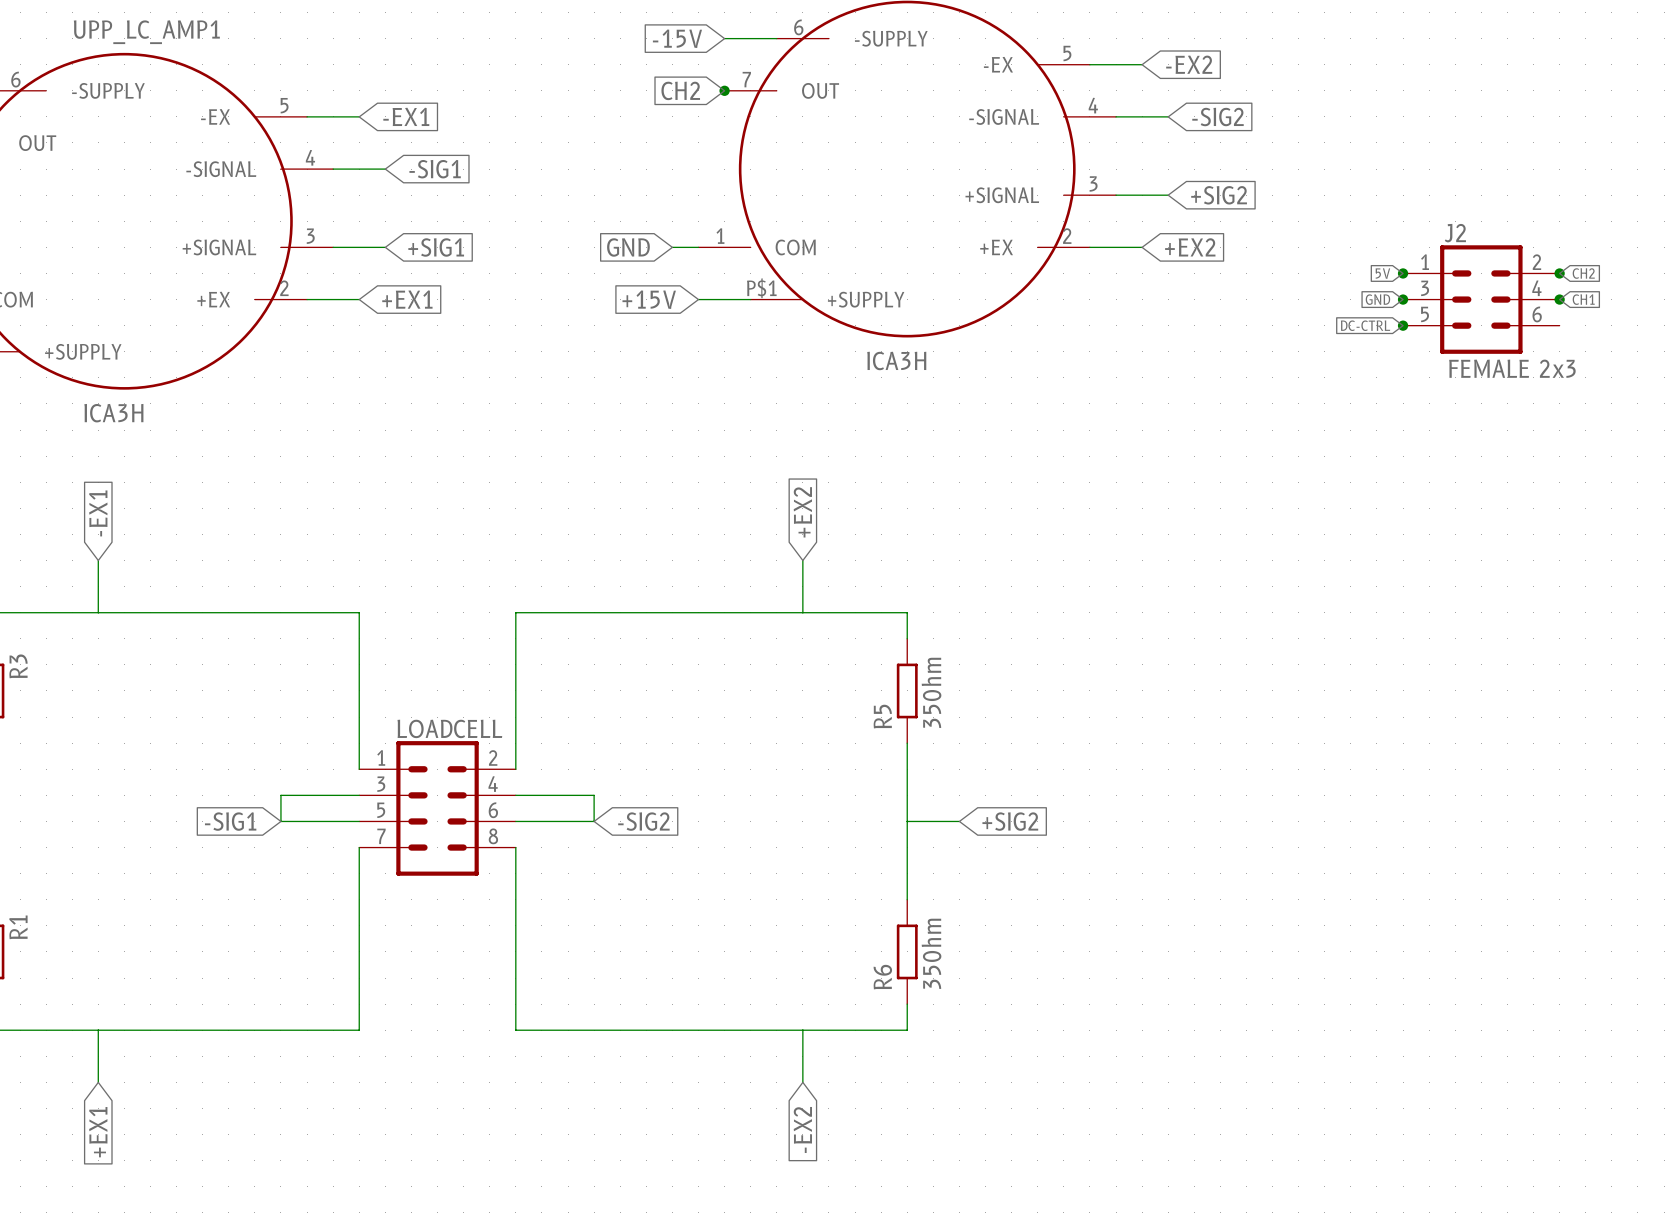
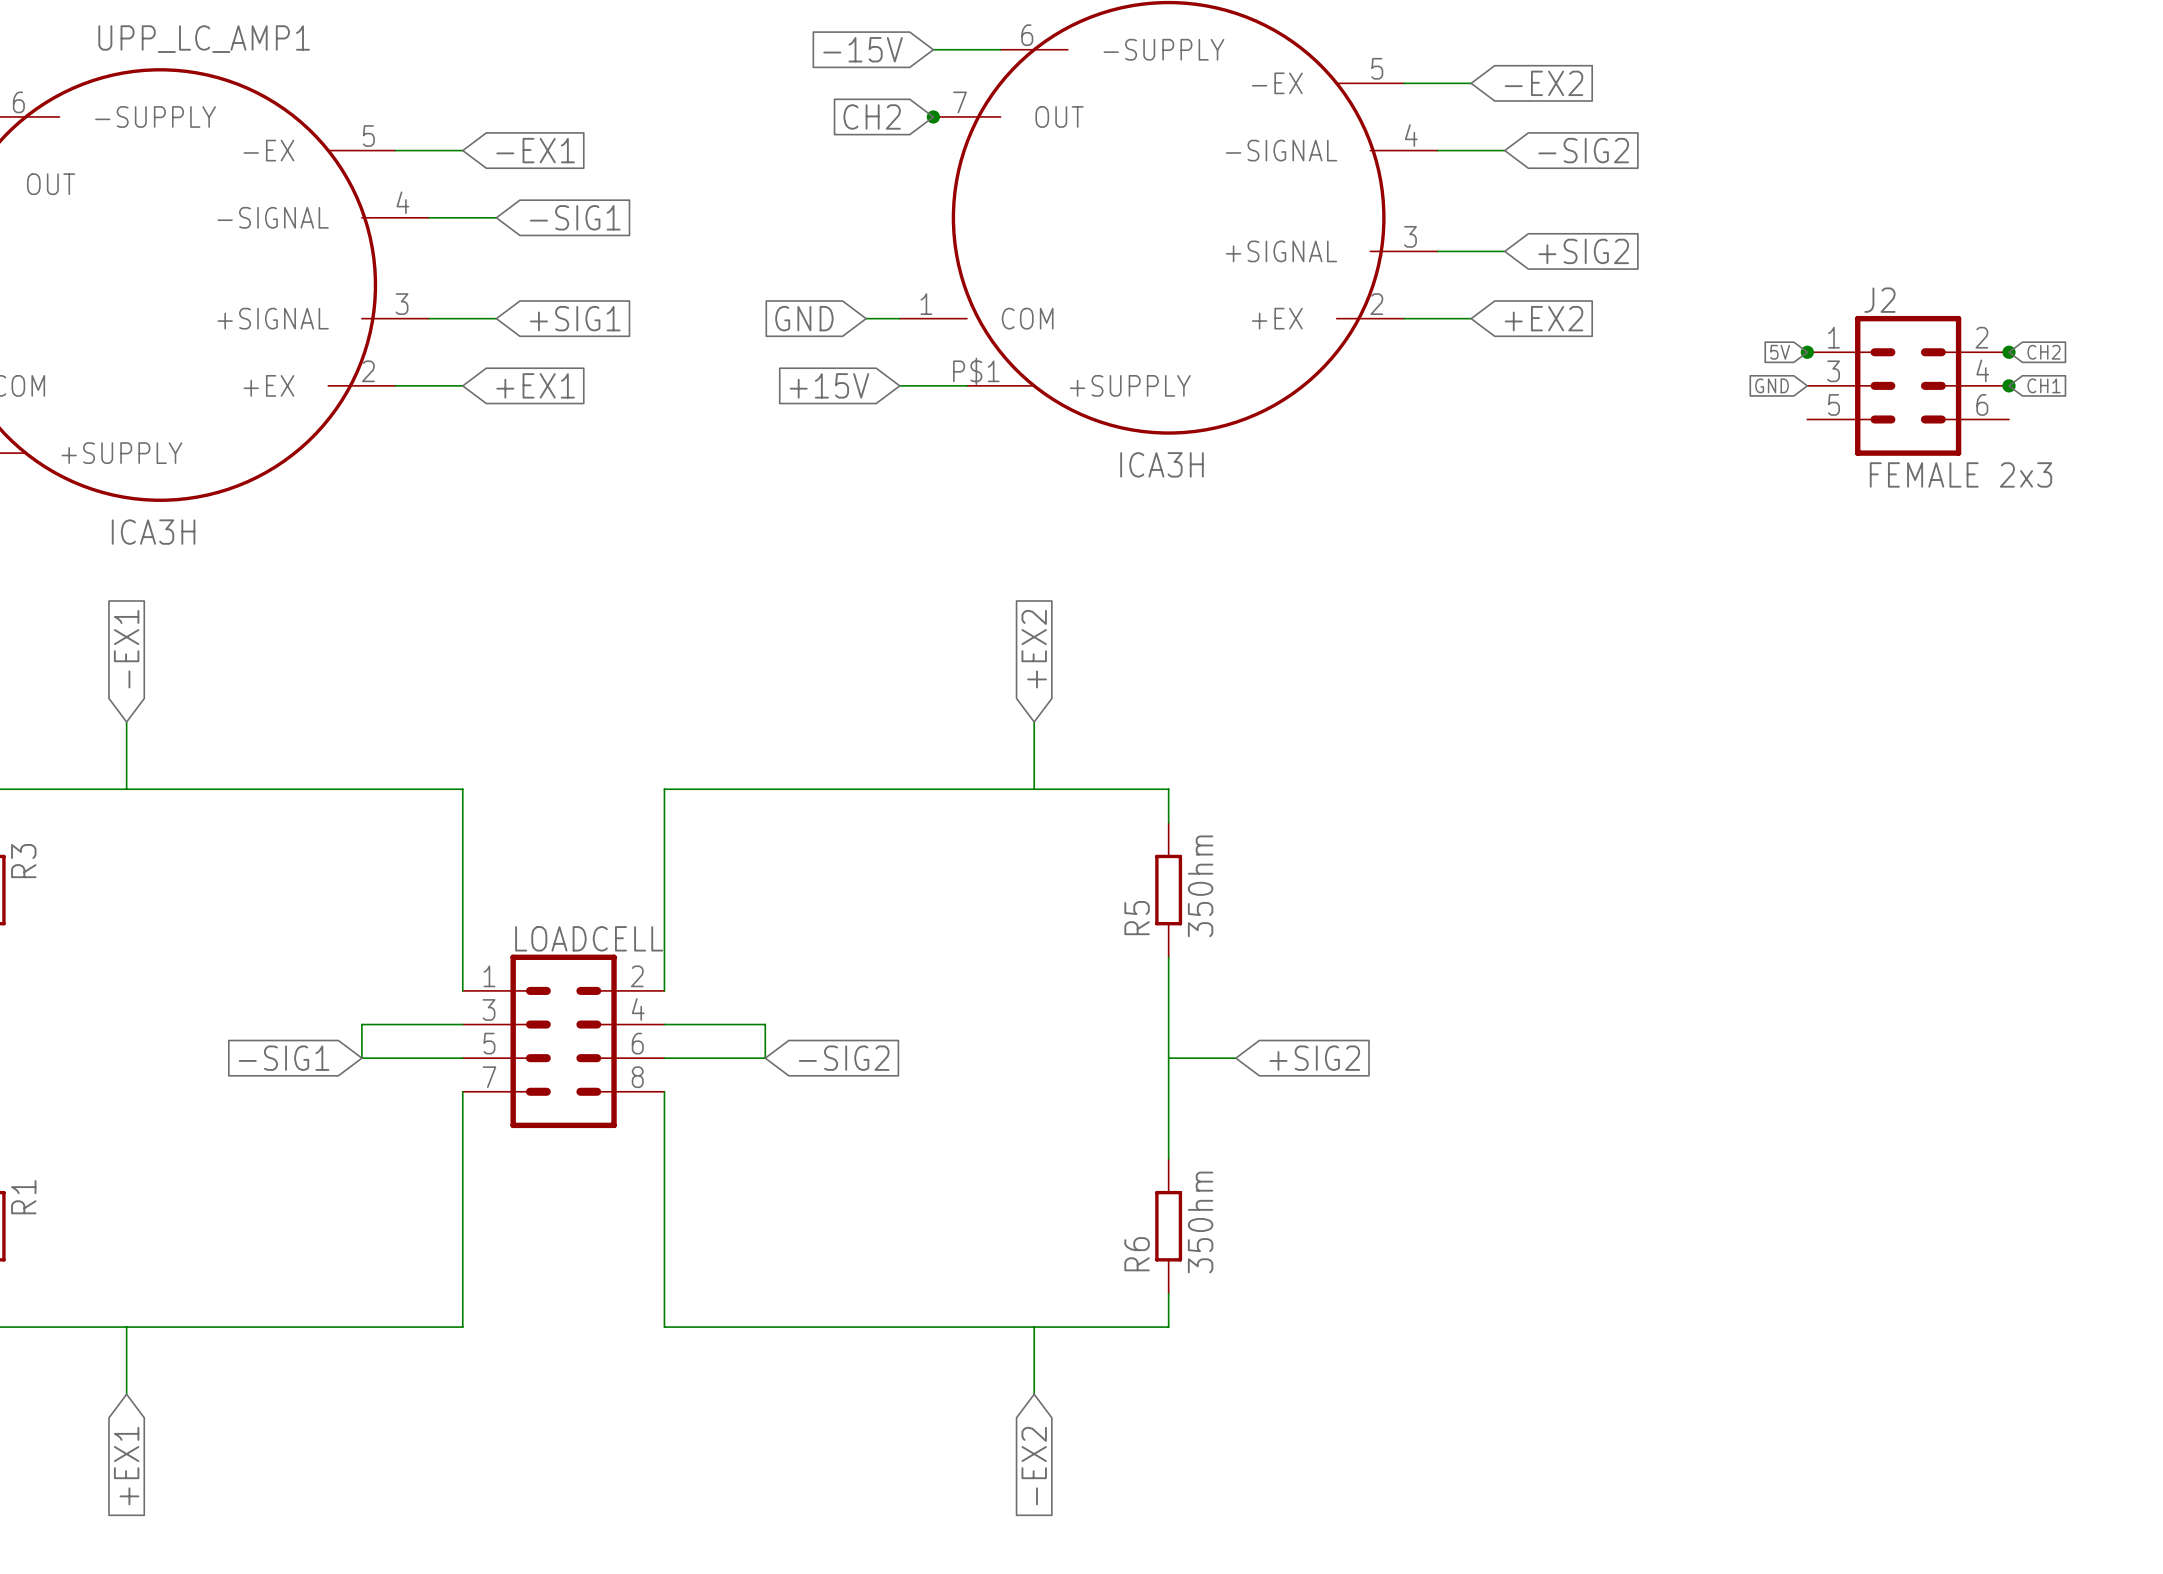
junction: (1403, 299) -> none
global label: DC-CTRL (1365, 325) -> none
junction: (1403, 325) -> none

